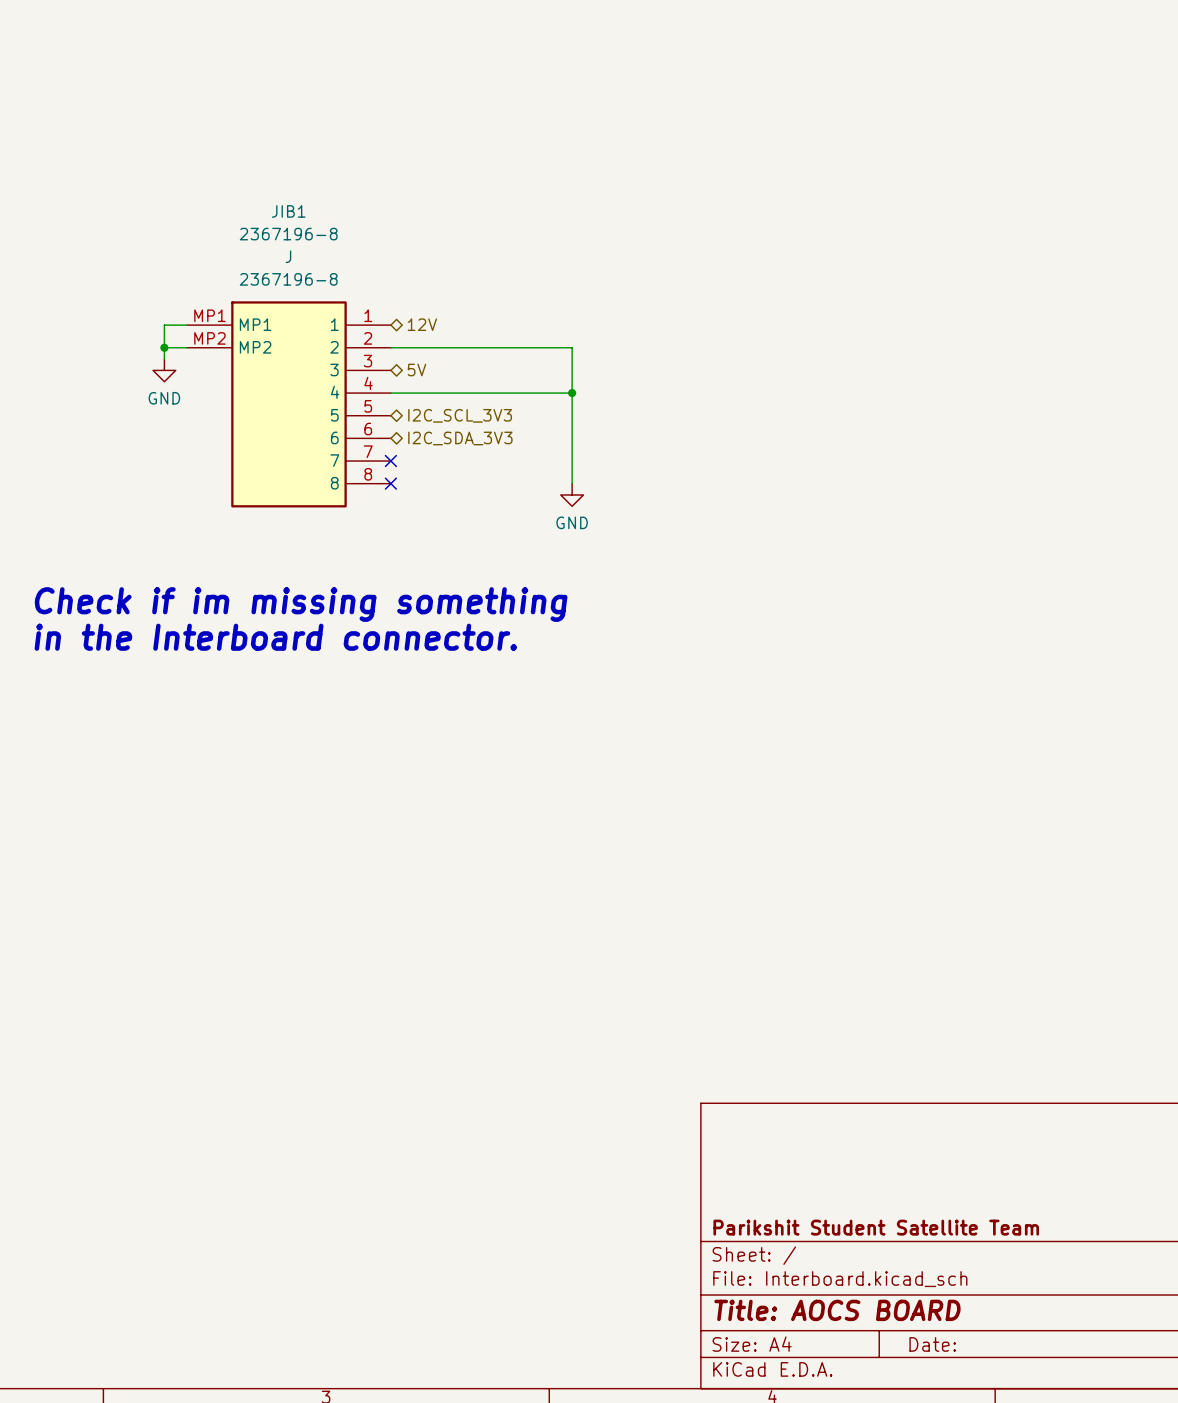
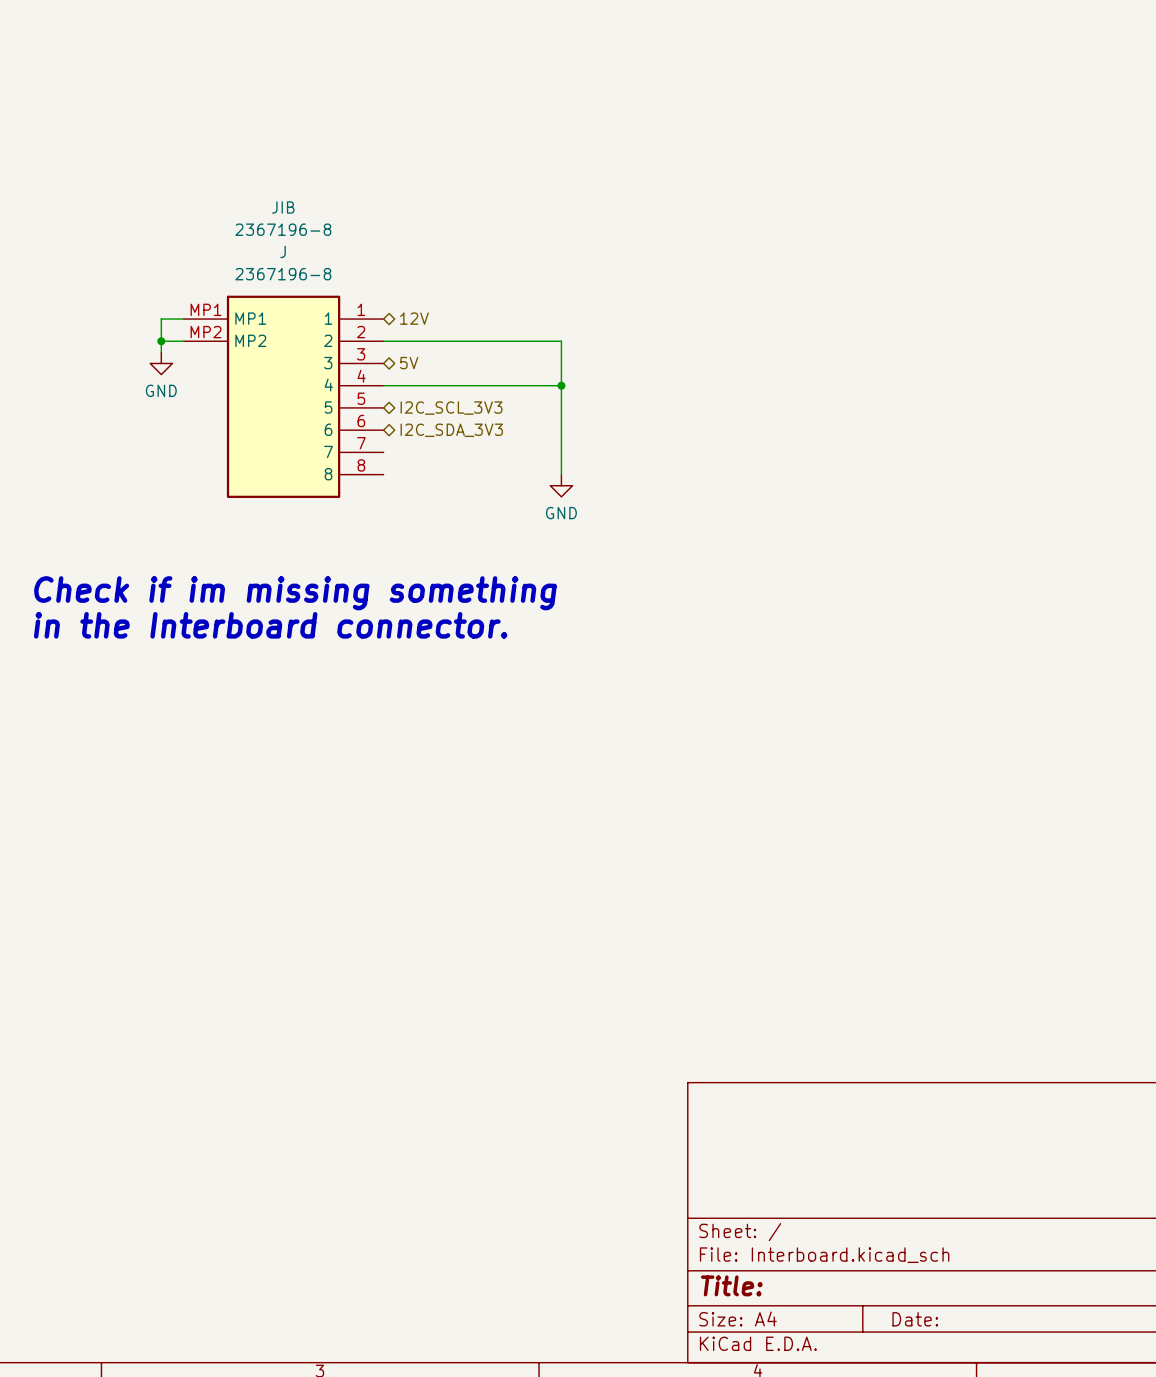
JIB1 name: JIB1 (288, 211) -> JIB (283, 207)
no-connect mark: (390, 461) -> none
no-connect mark: (390, 483) -> none
title block: Parikshit Student Satellite Team (876, 1227) -> none
title block: Title: AOCS BOARD (837, 1310) -> Title: (731, 1285)

